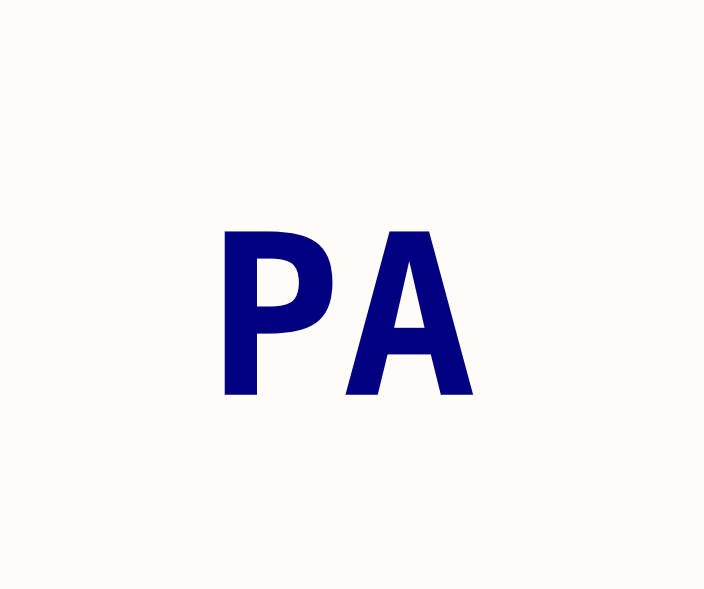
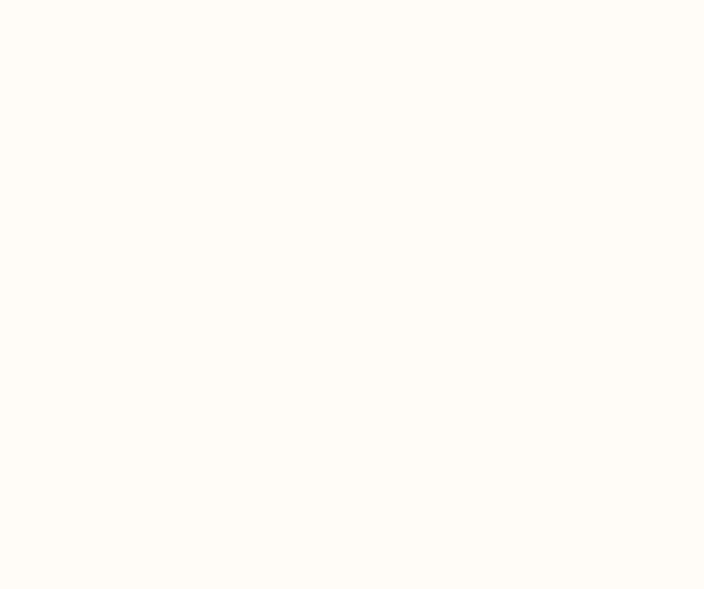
text: PA (348, 313) -> none

